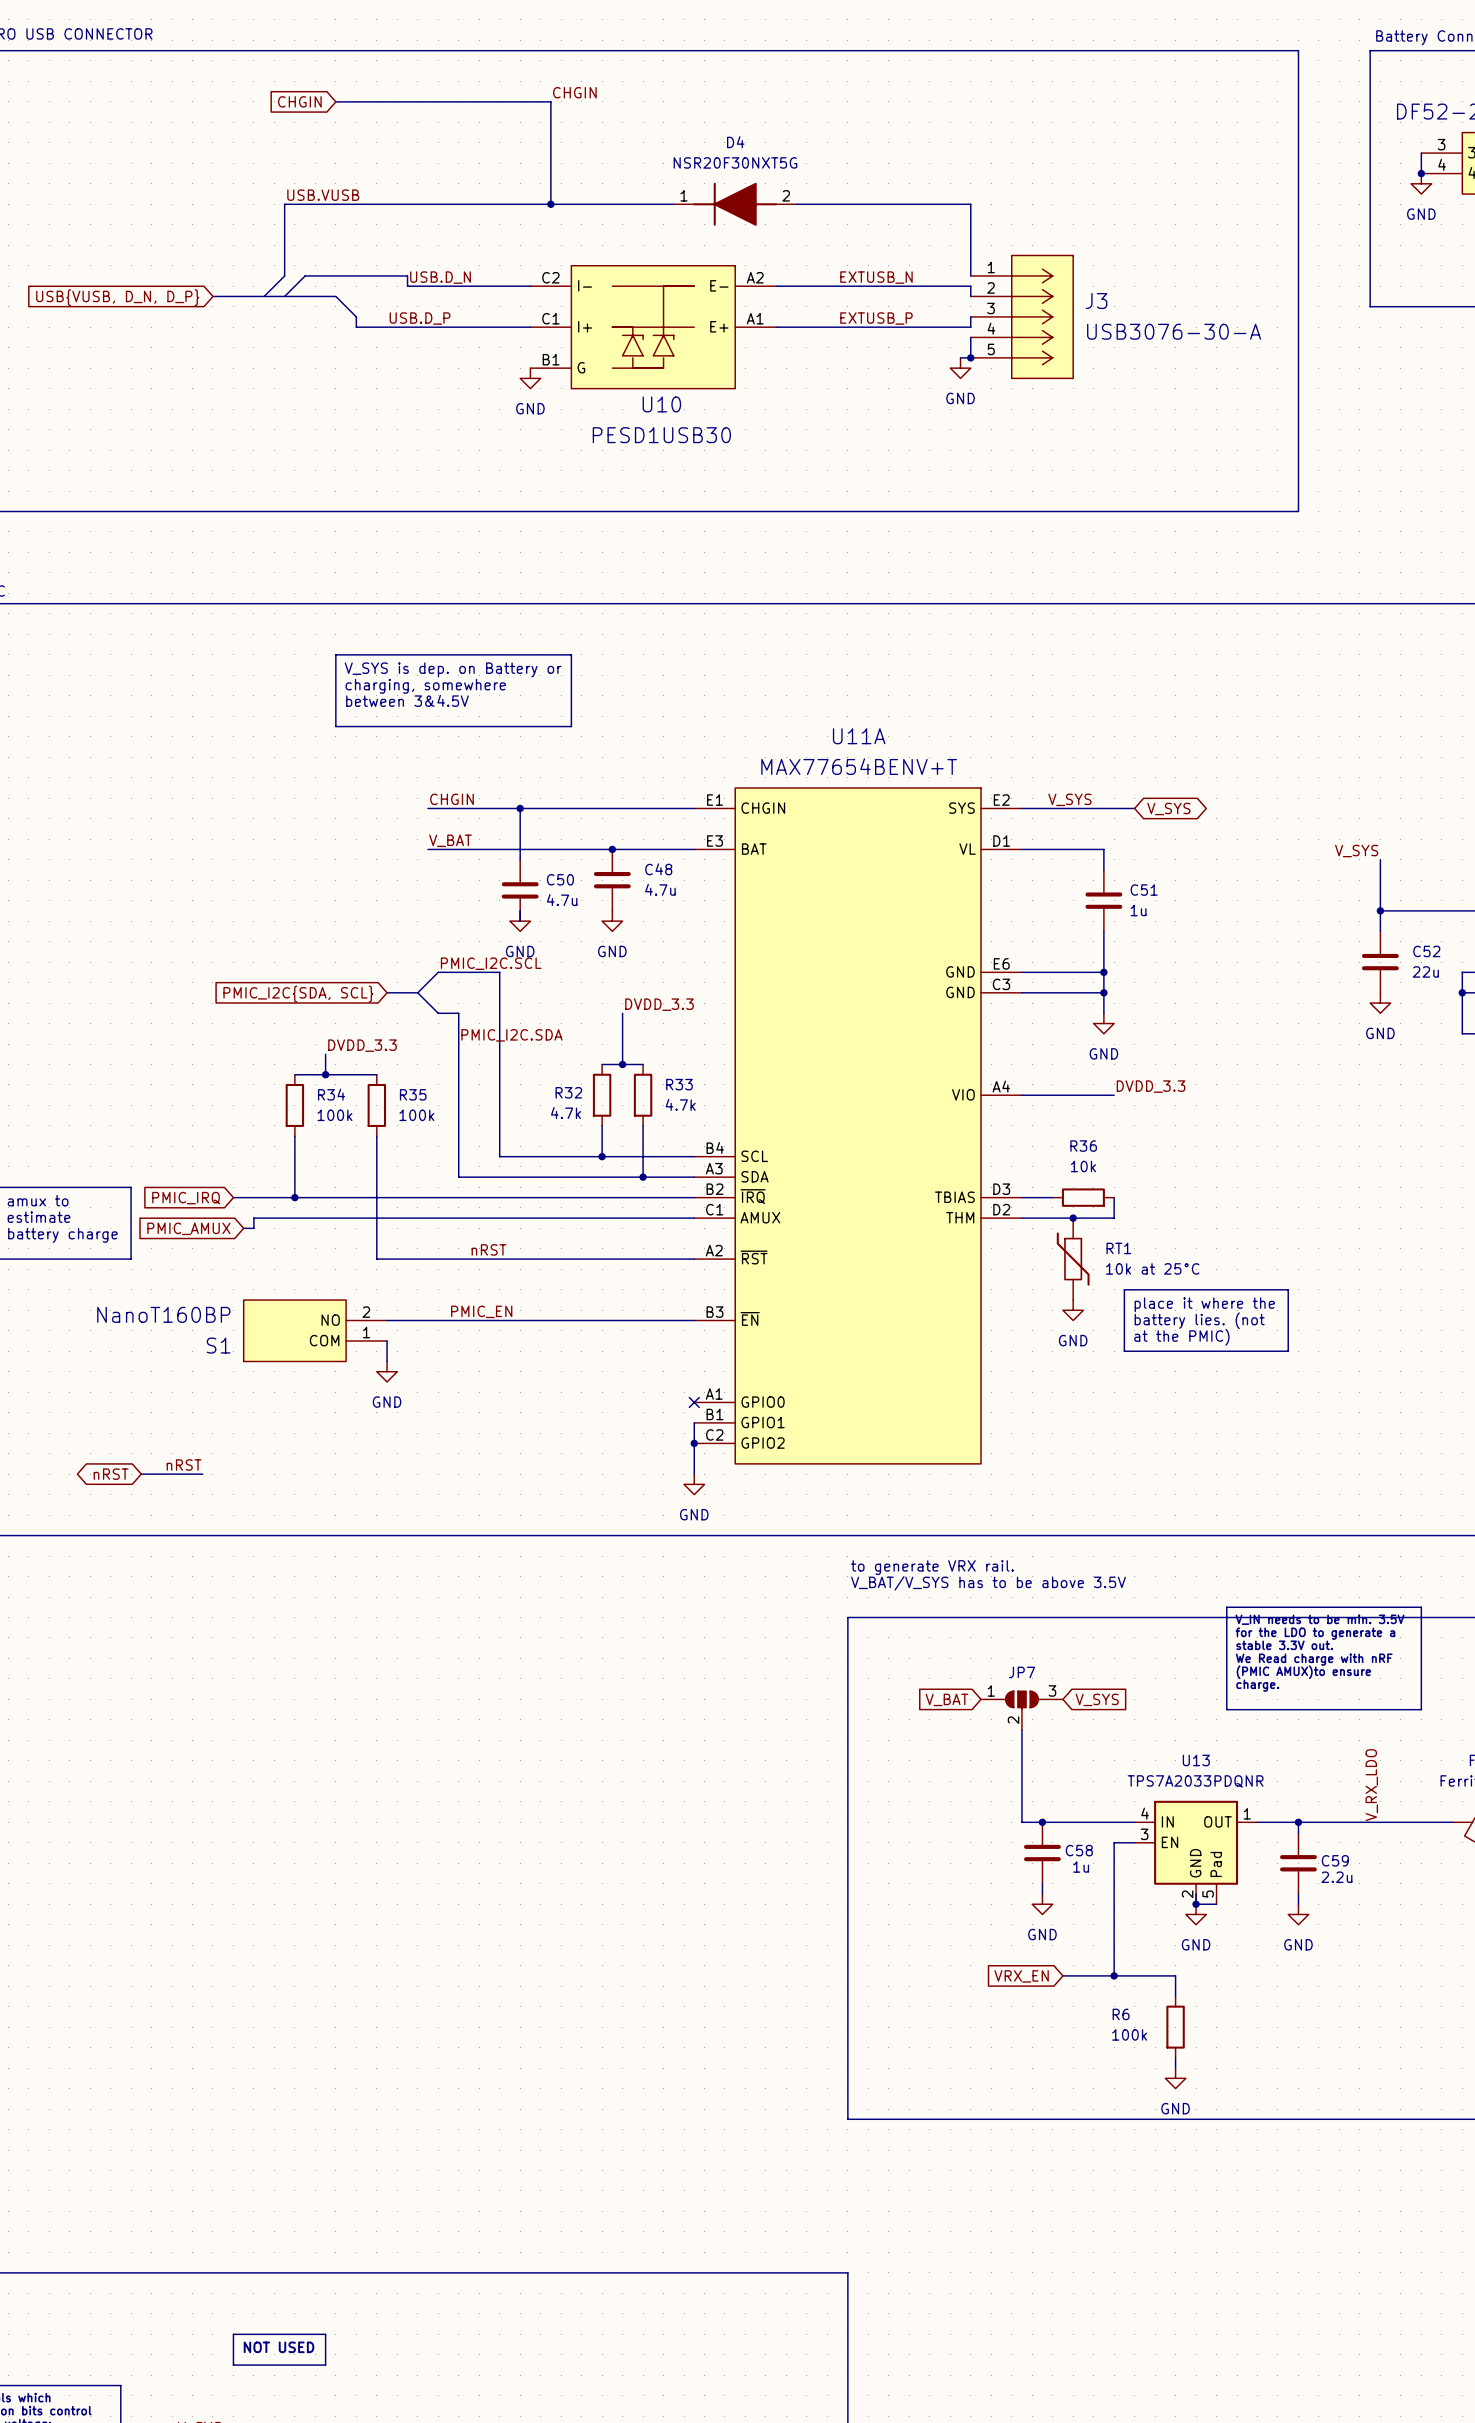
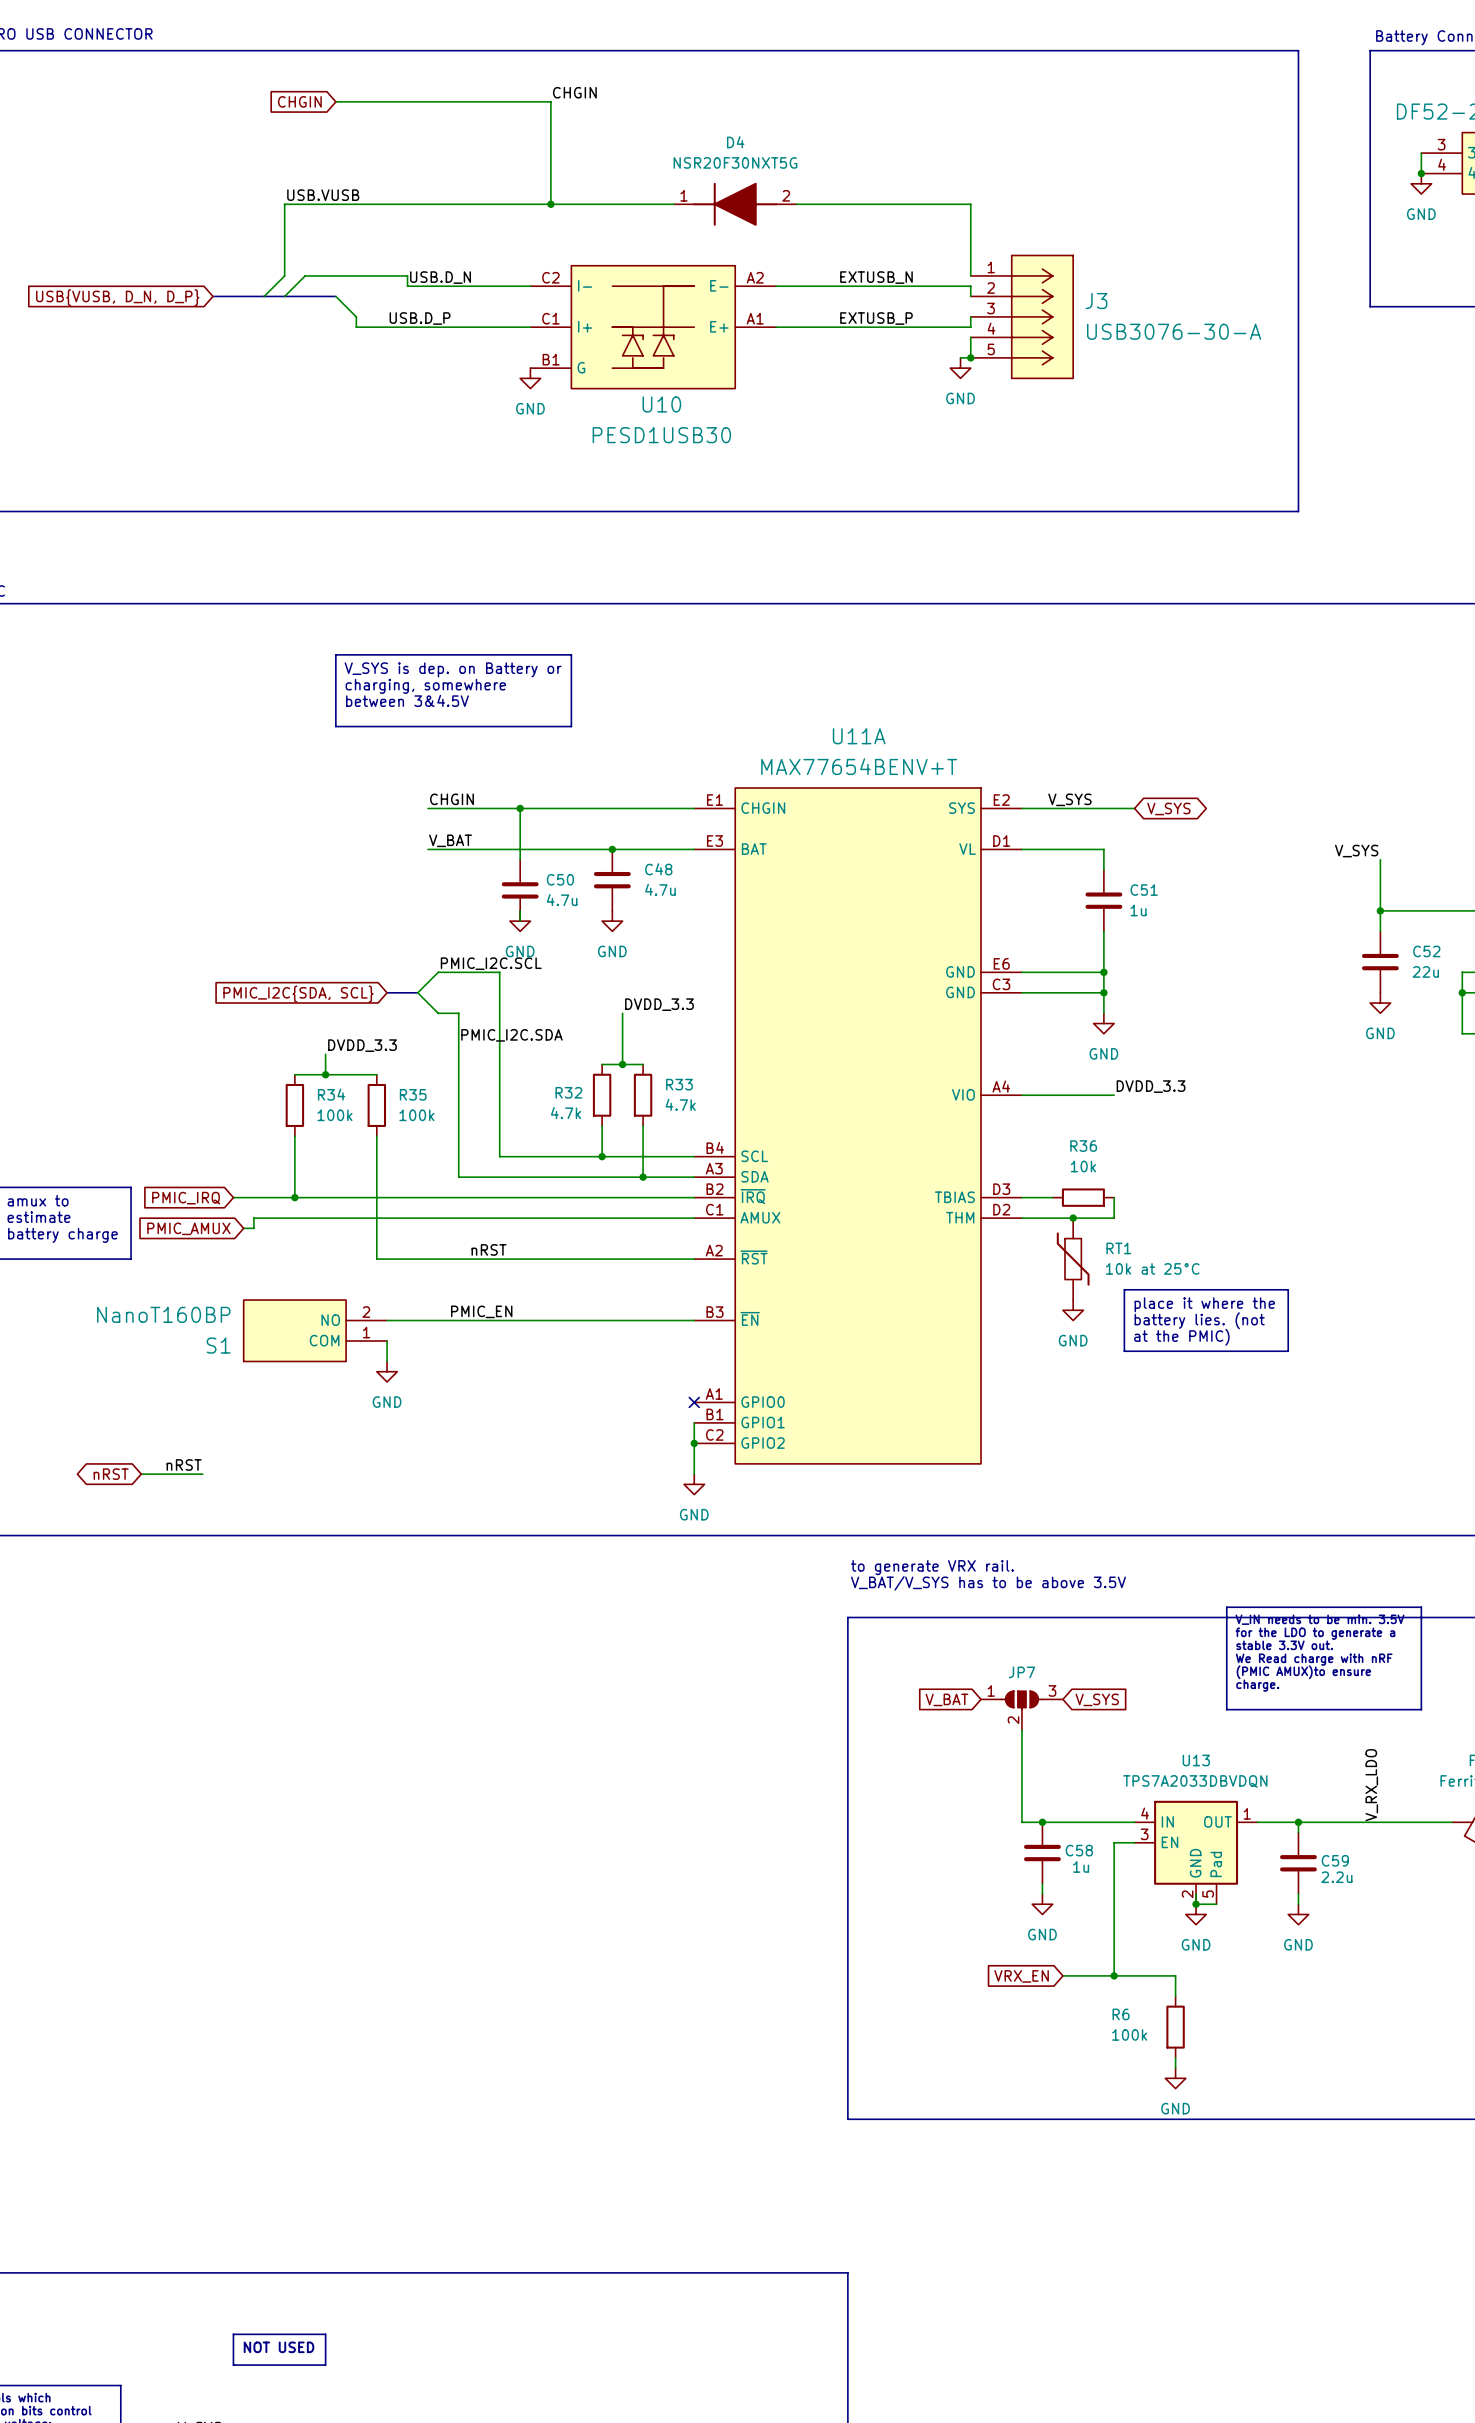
U13 value: TPS7A2033PDQNR (1195, 1781) -> TPS7A2033DBVDQN (1195, 1781)

